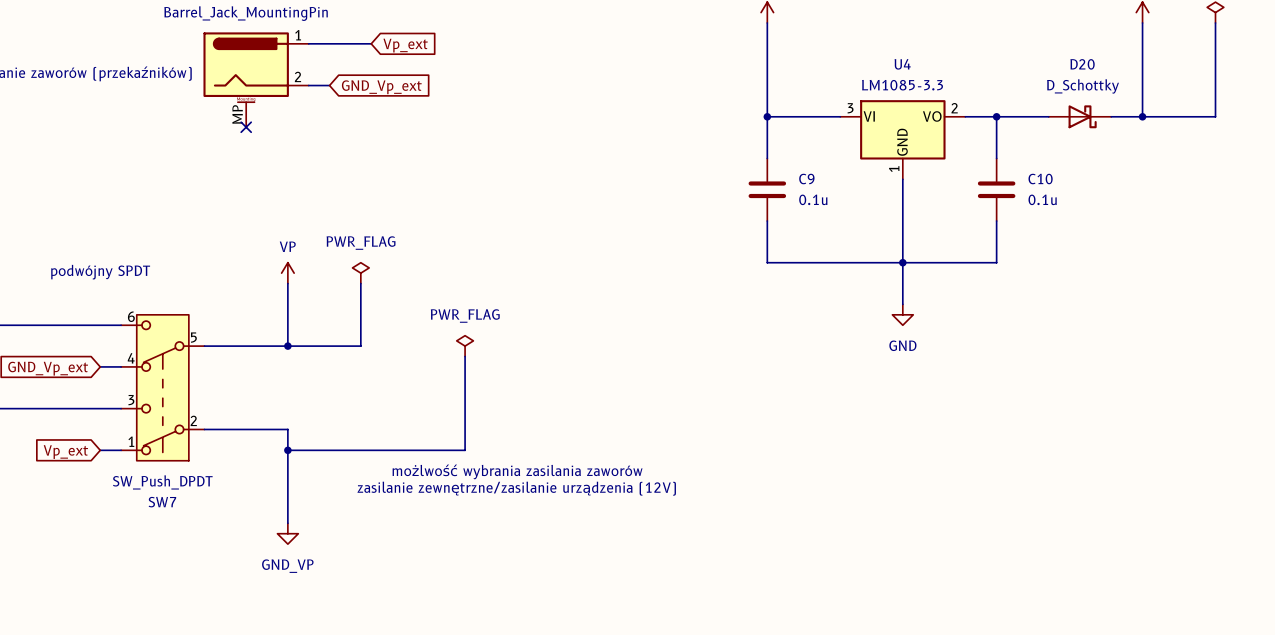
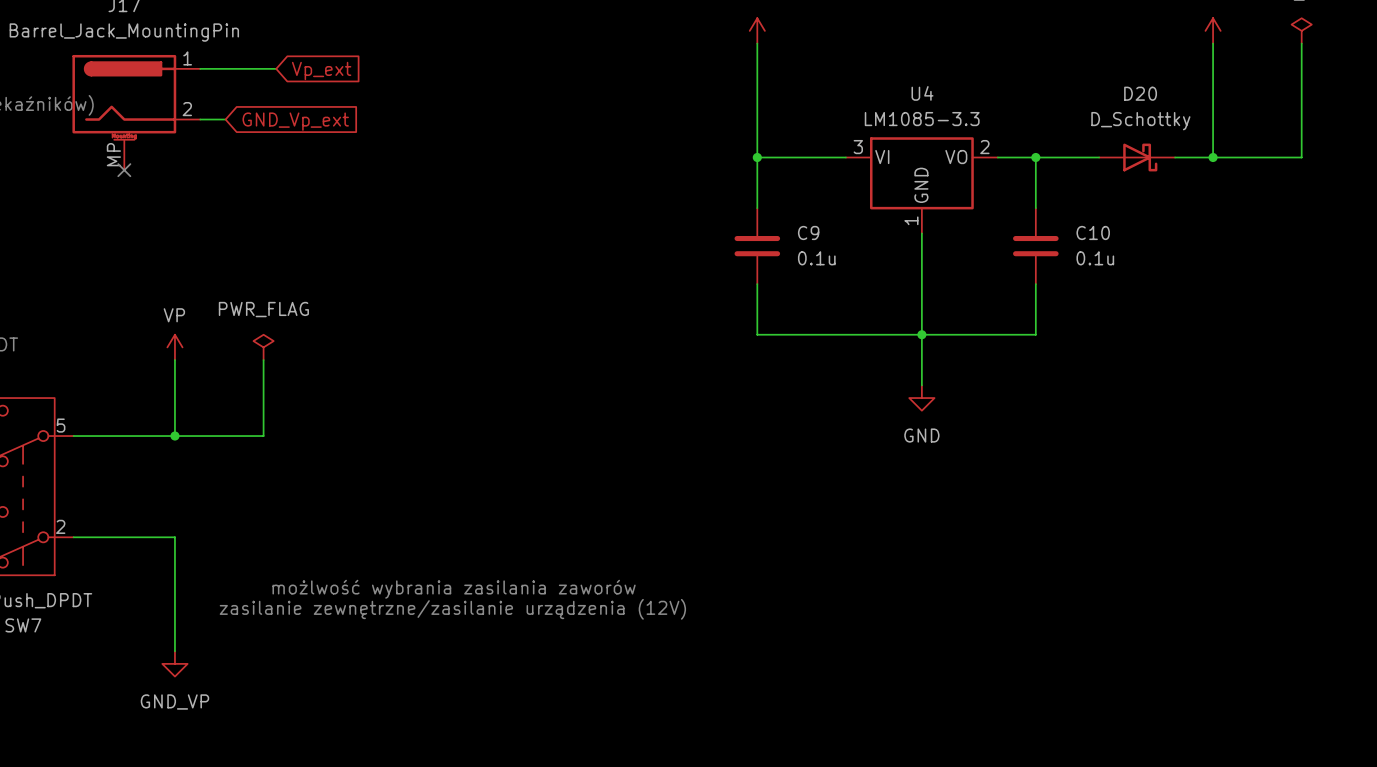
power symbol: PWR_FLAG (465, 346) -> none
wire: (465, 356) (465, 450) (287, 450) -> none
junction: (287, 450) -> none

